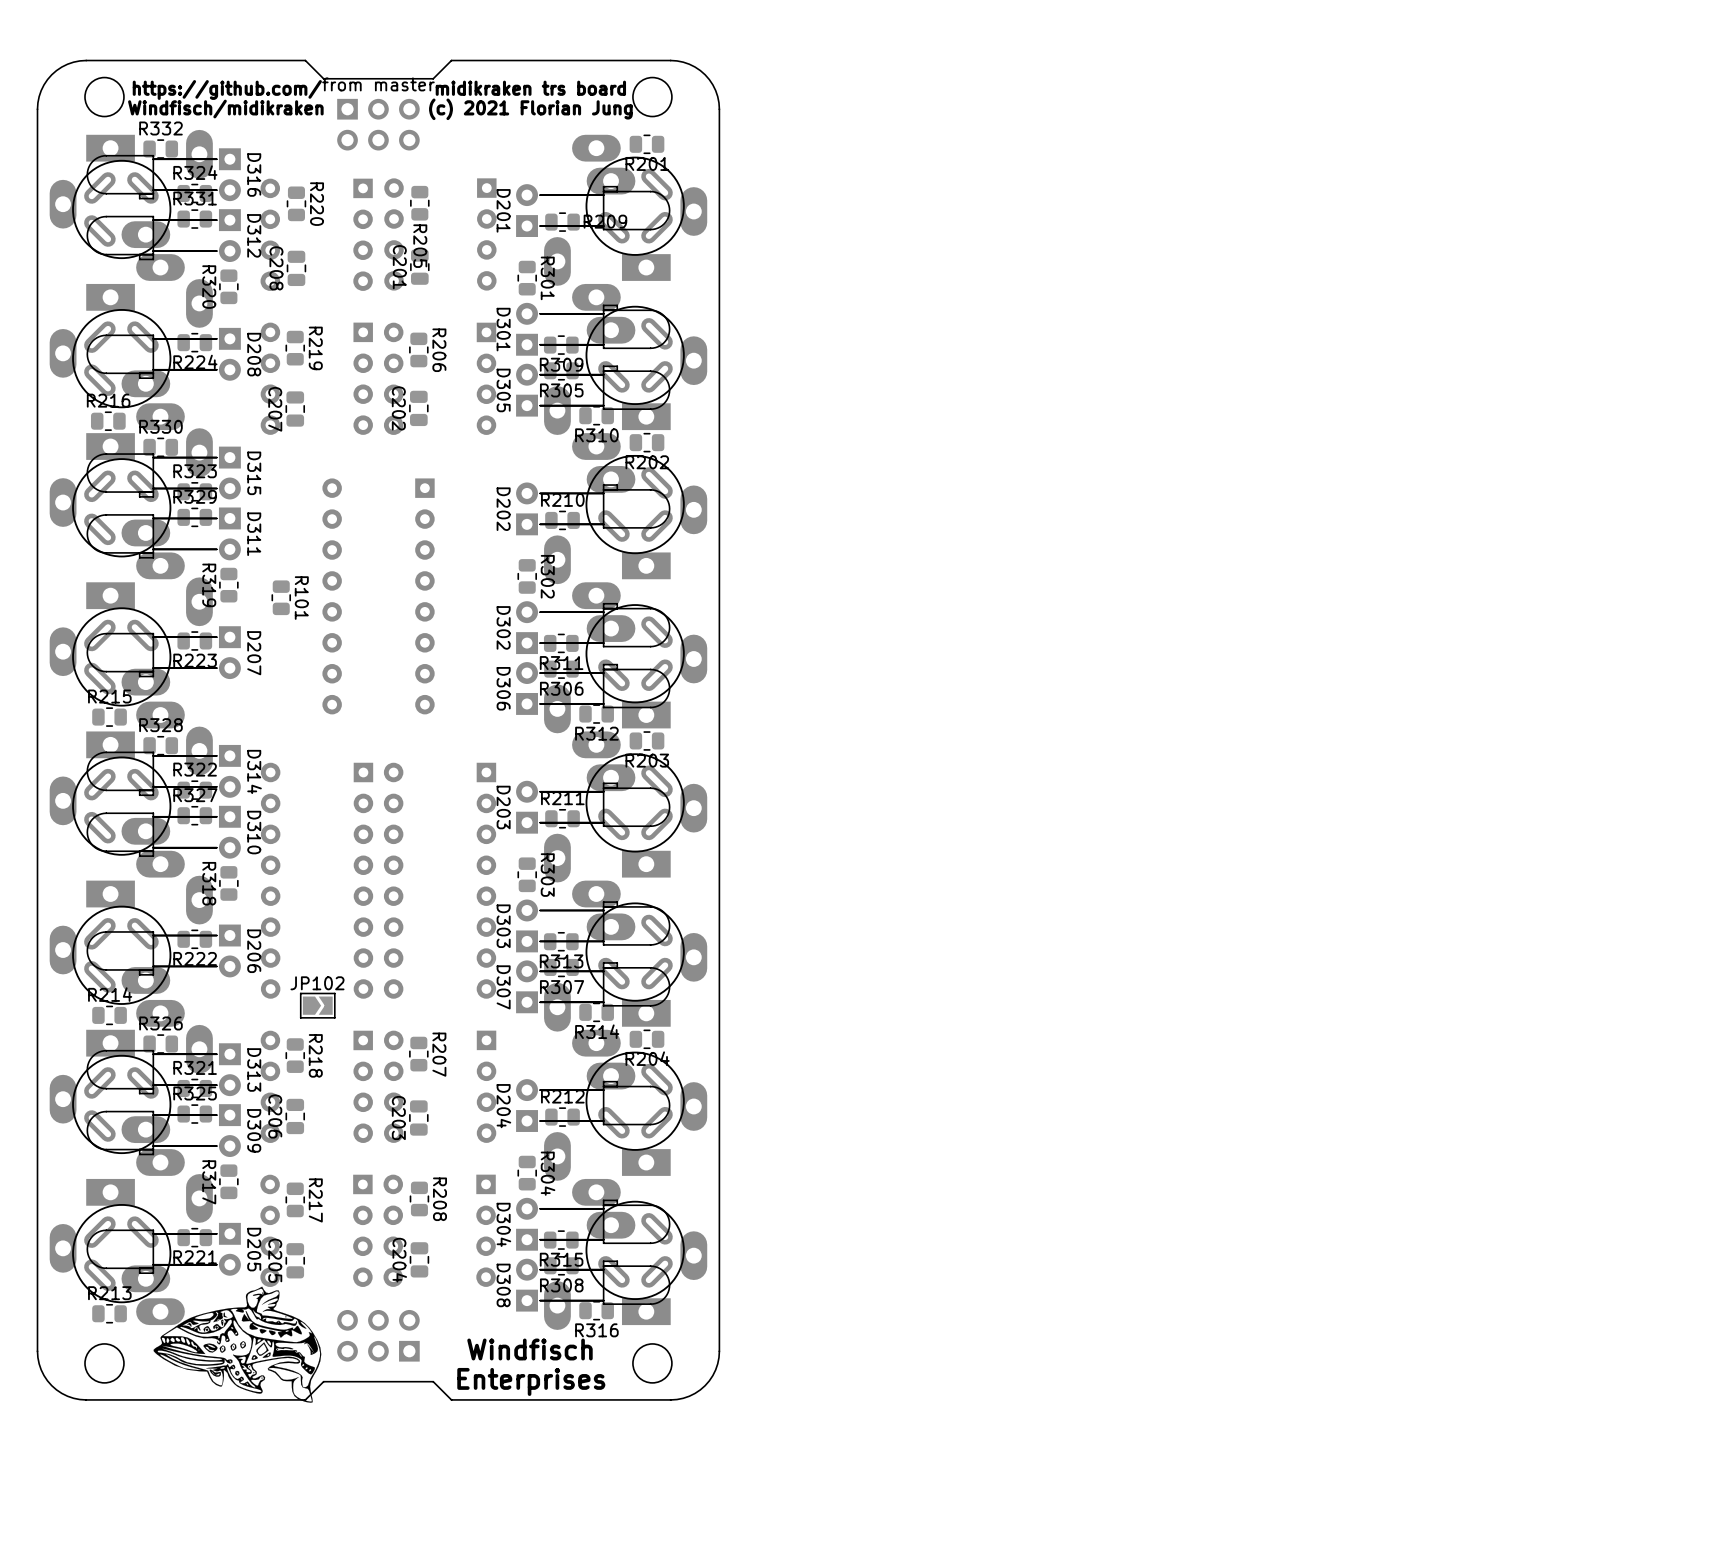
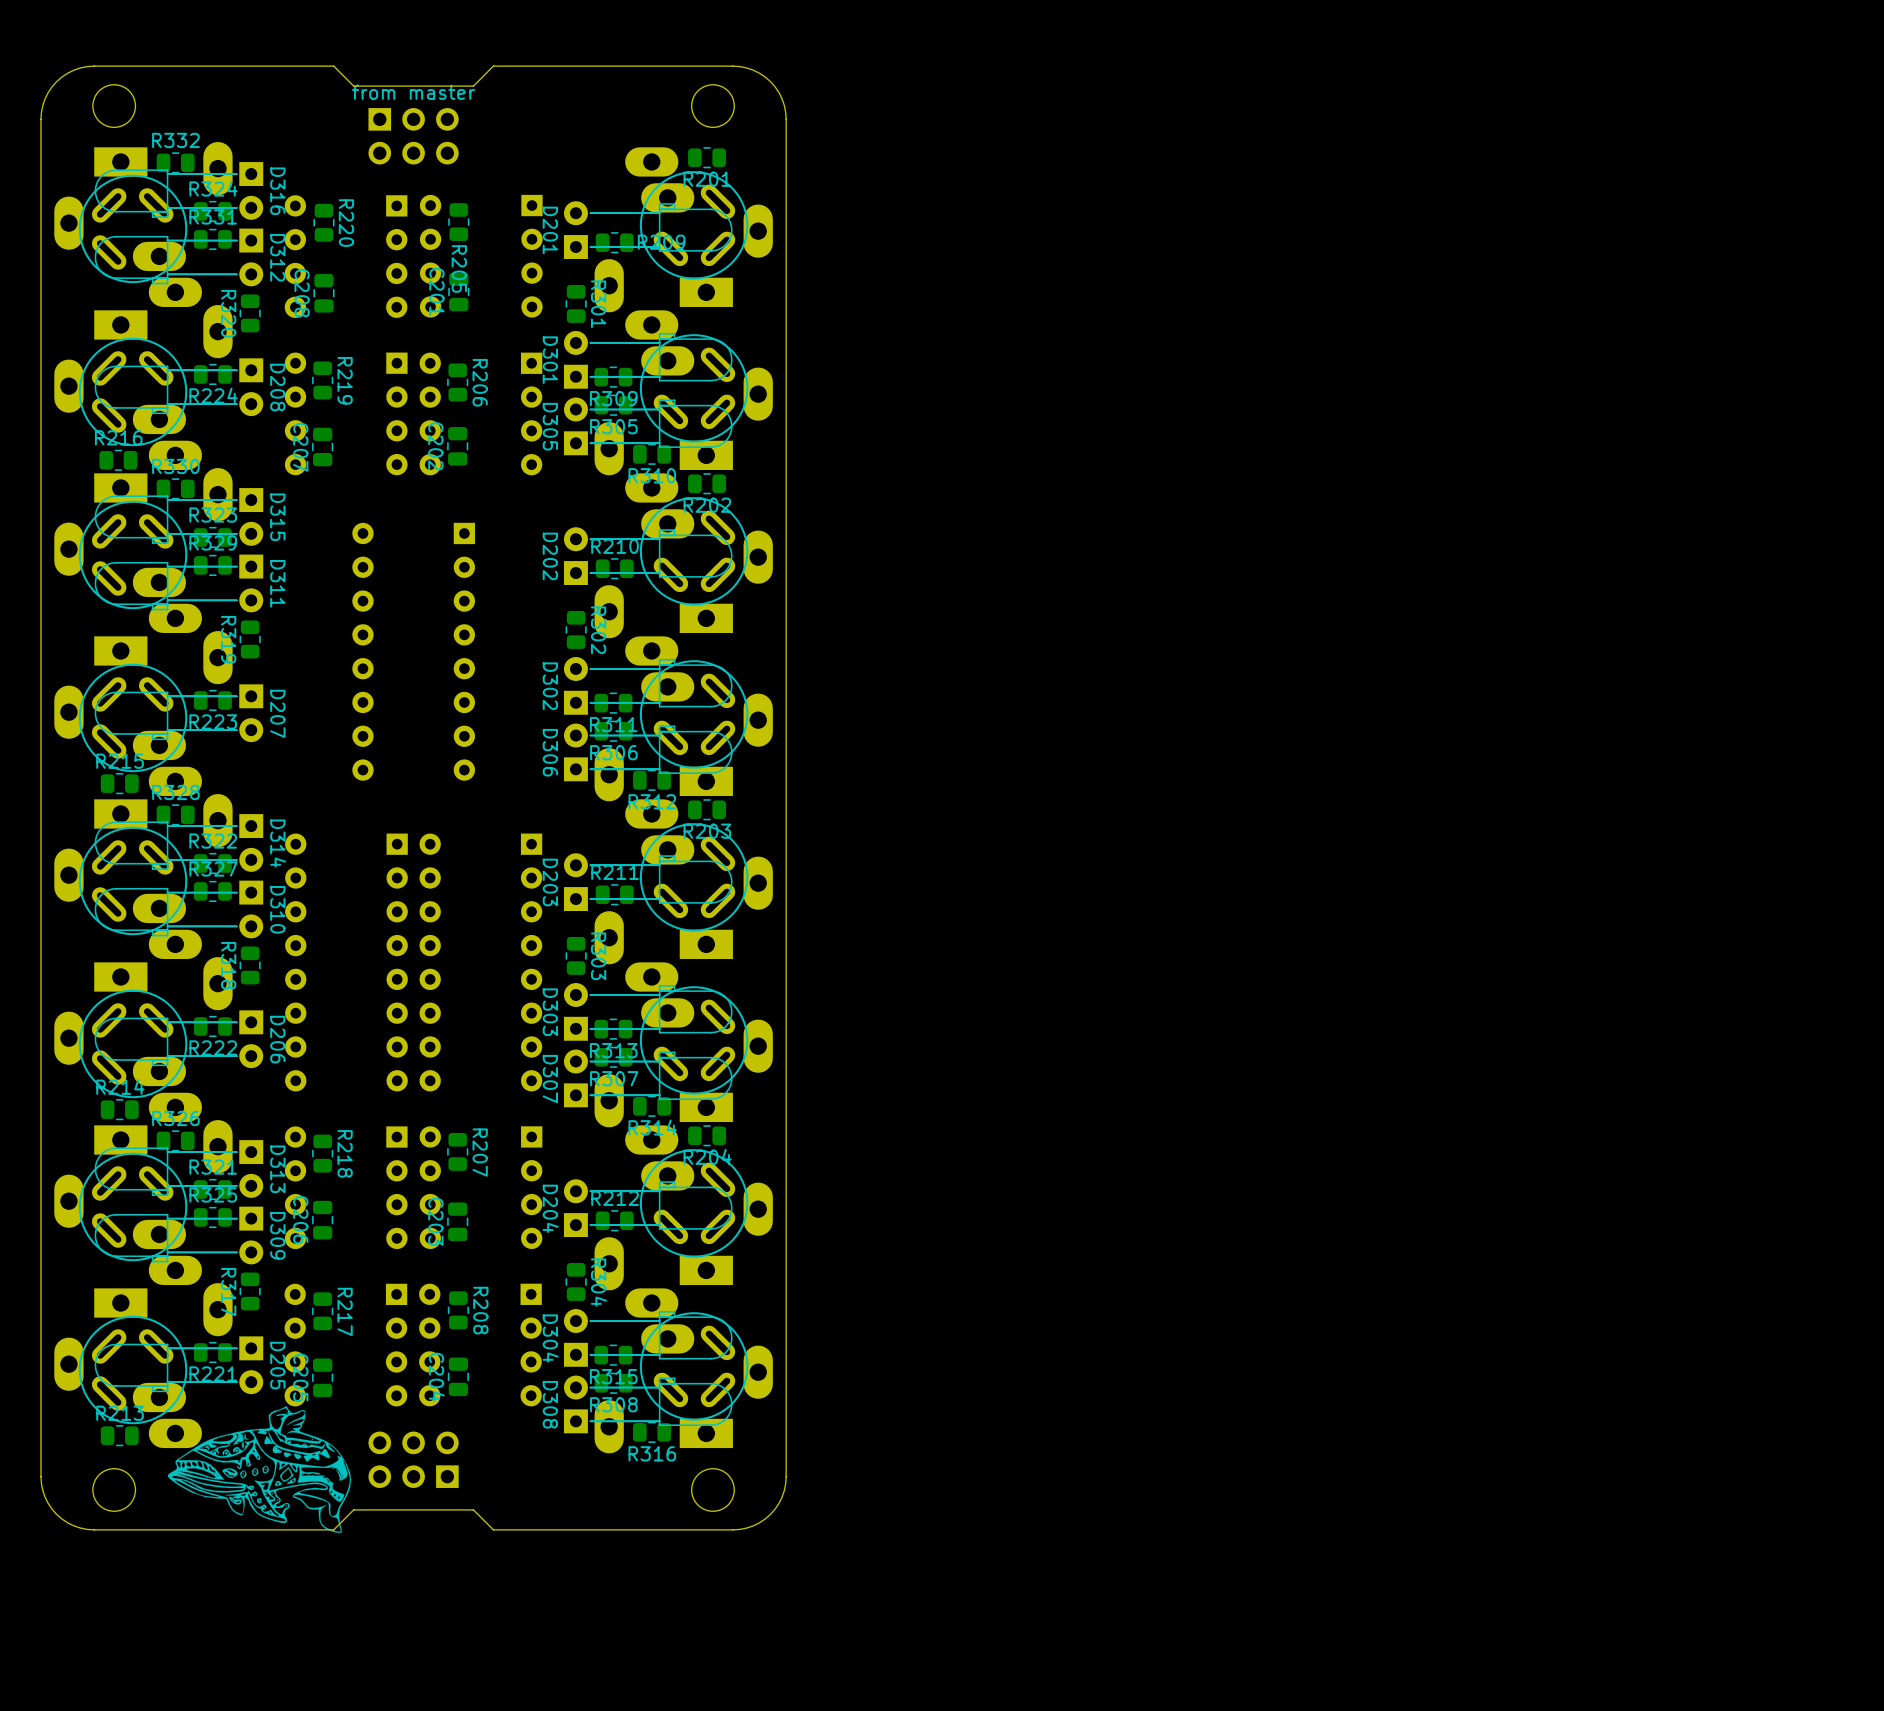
text: midikraken trs board (530, 88) -> none
text: https://github.com/ (227, 89) -> none
text: Windfisch/midikraken (225, 109) -> none
text: (c) 2021 Florian Jung (530, 109) -> none
R101: (281, 597) -> none
JP102: (317, 1005) -> none
text: Windfisch (529, 1349) -> none
text: Enterprises (531, 1381) -> none

